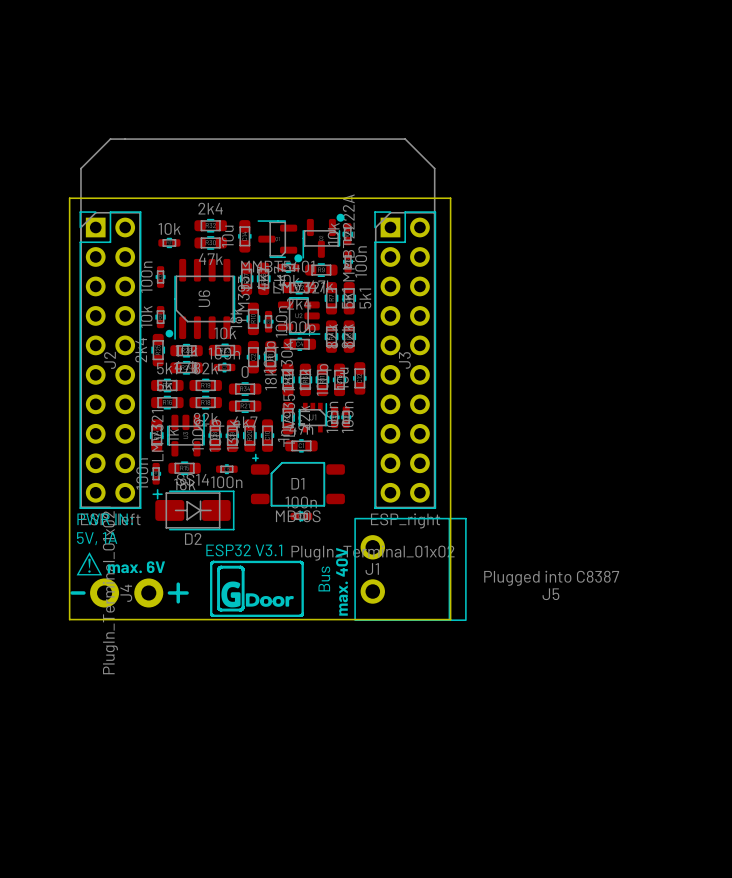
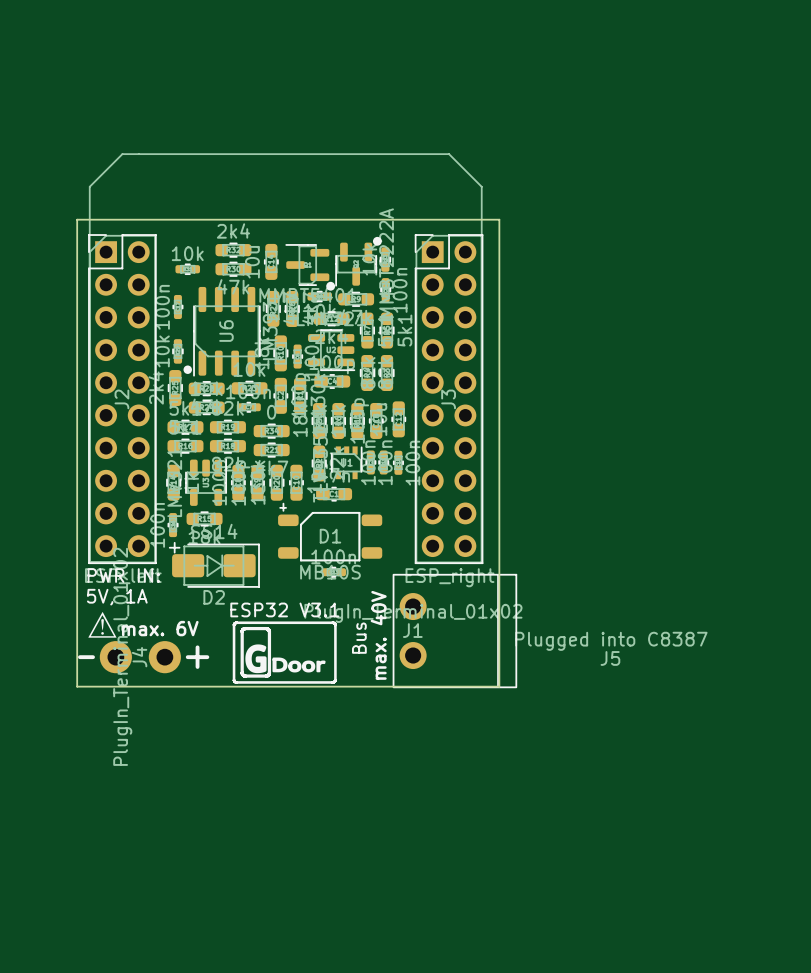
part rotation: 0° (226, 469) -> 90° clockwise (398, 462)
part position: (226, 469) -> (398, 462)

